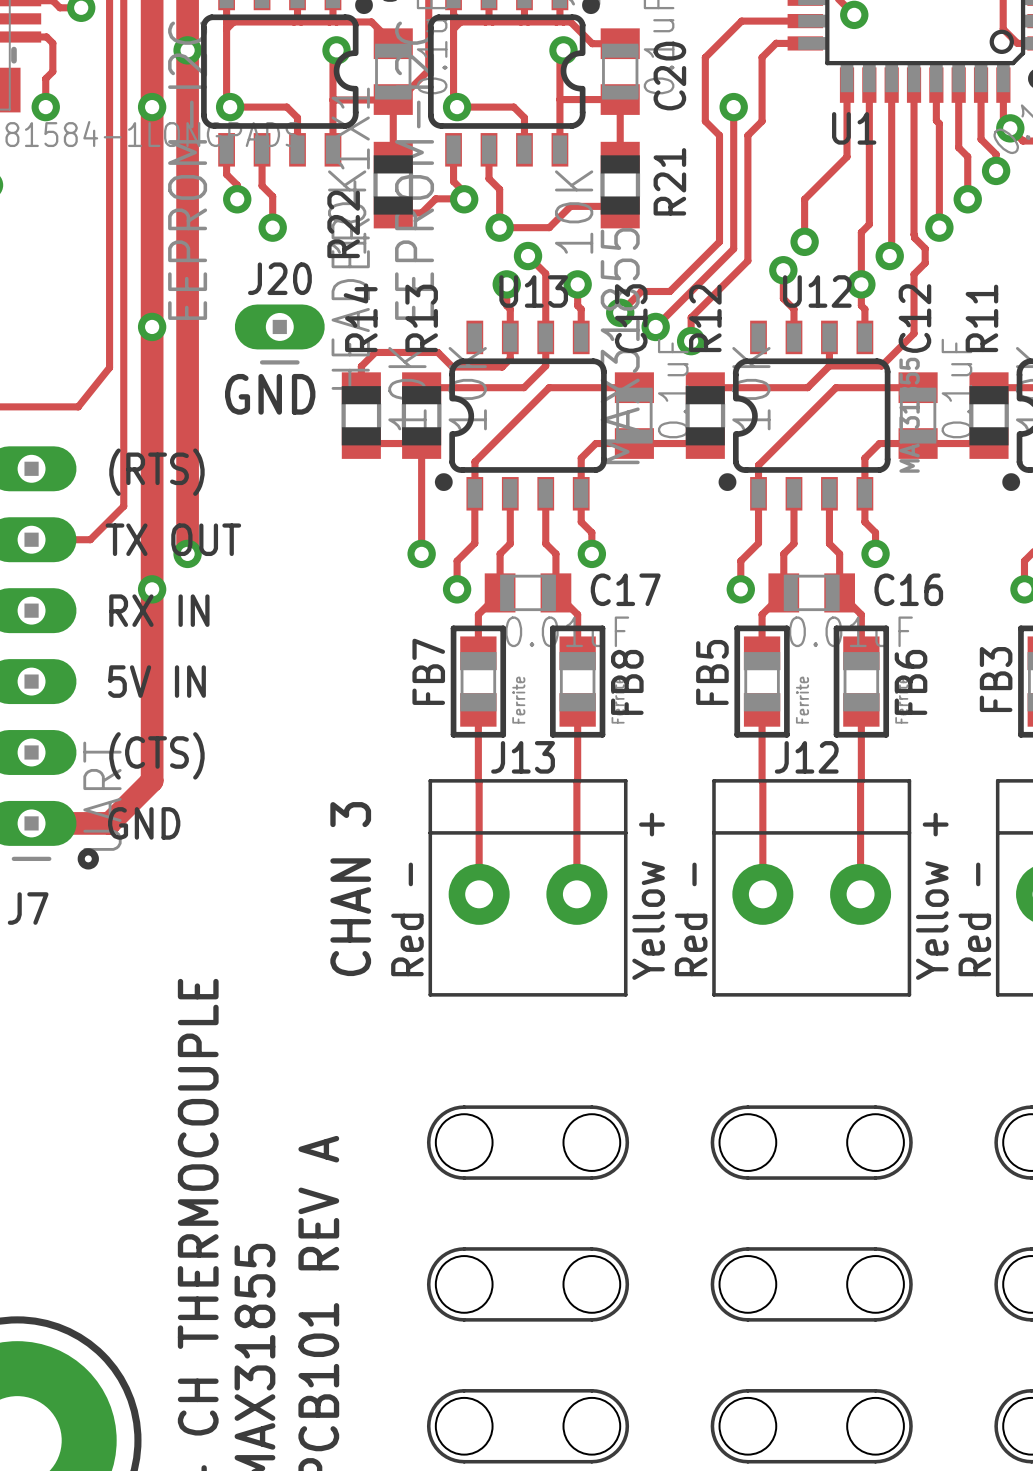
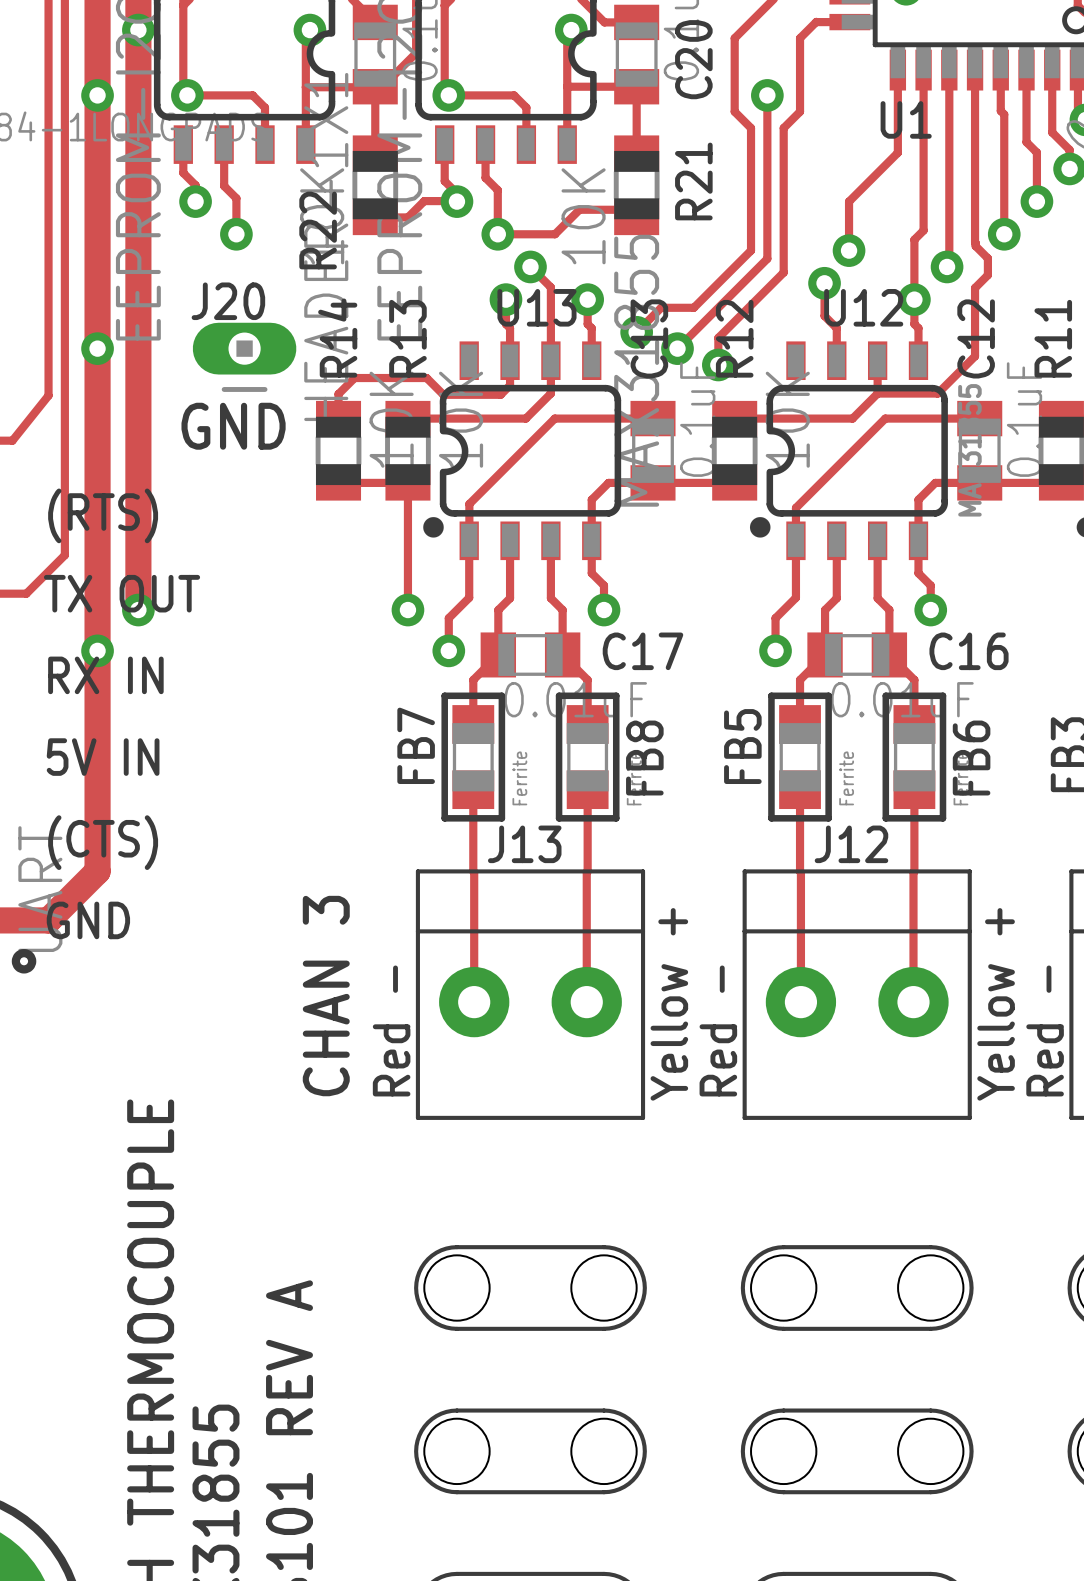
J20 name position: J20 (279, 278) -> J20 (228, 301)

